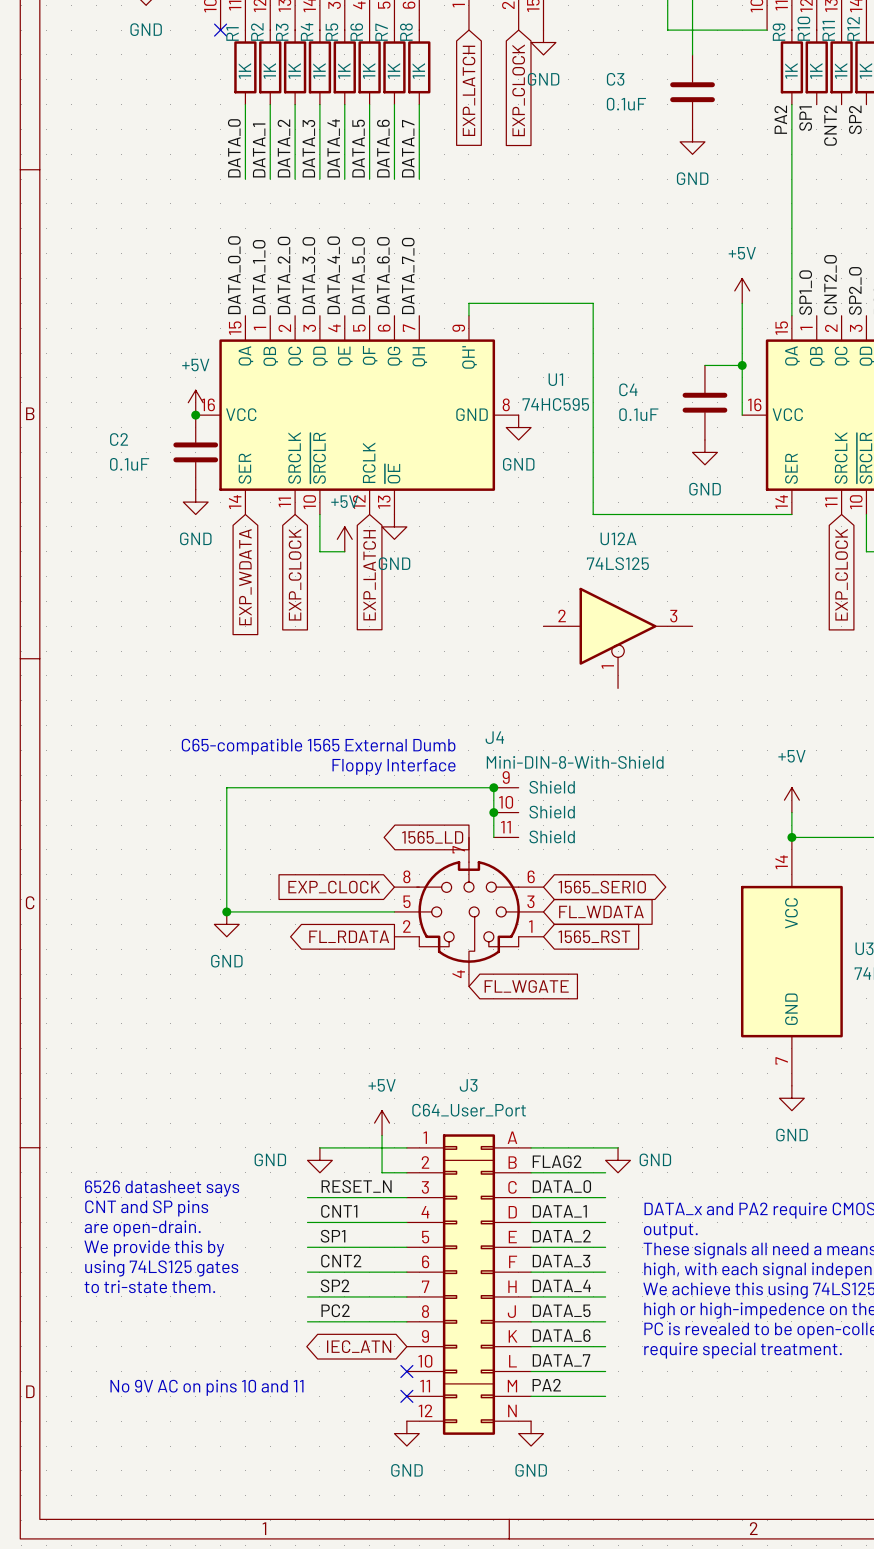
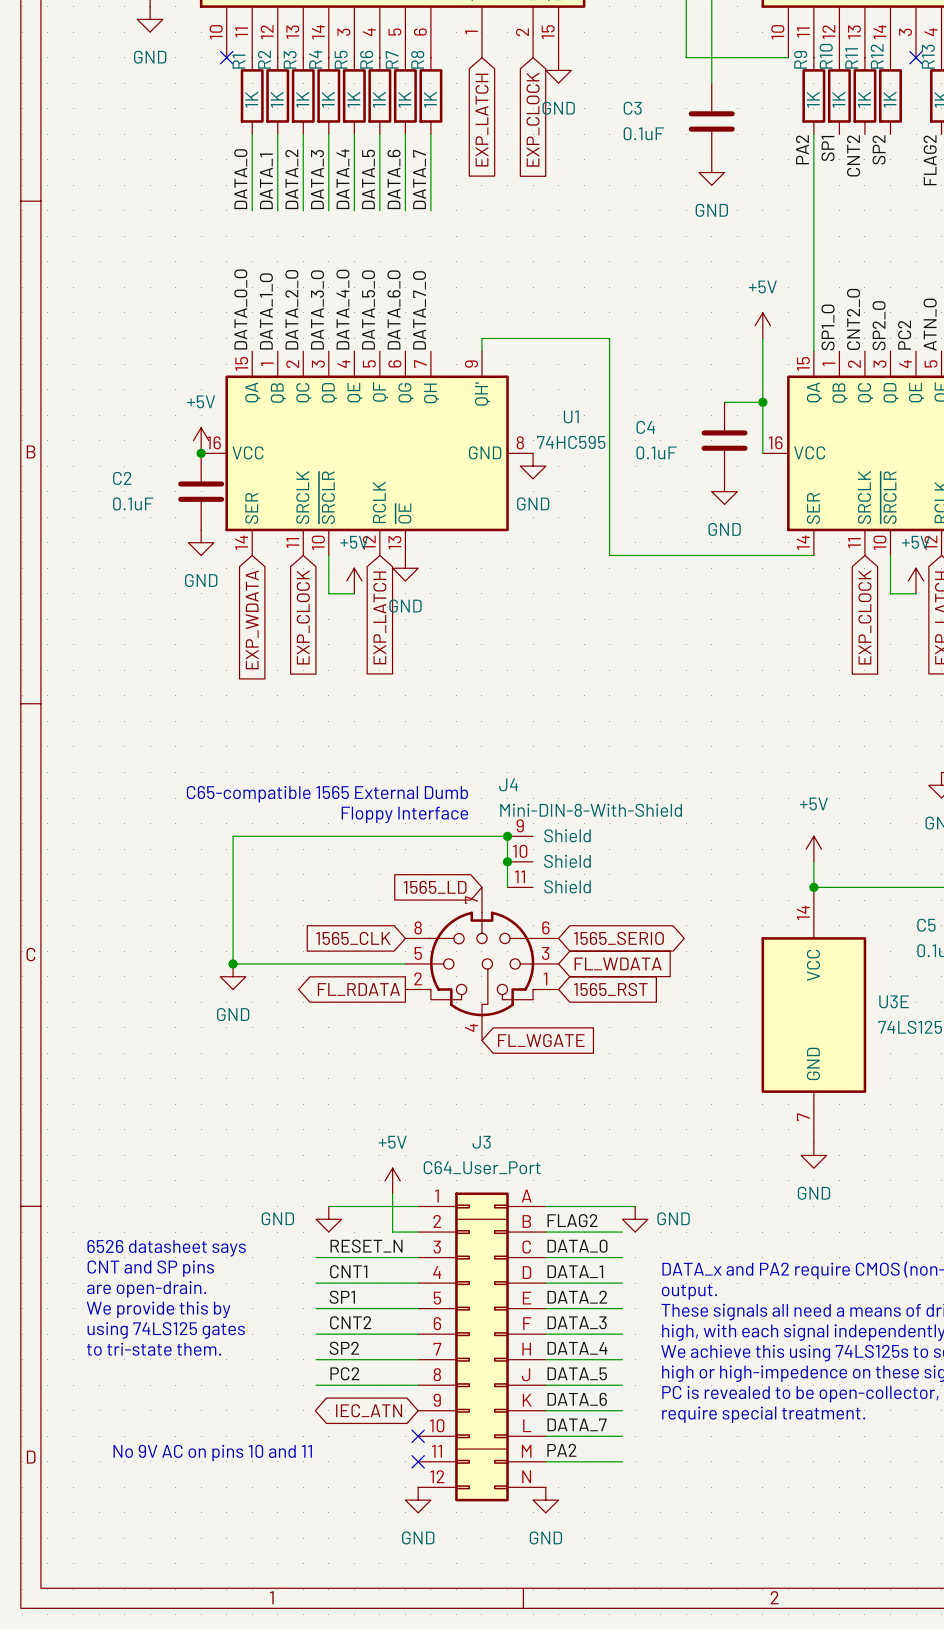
U12A: 74LS125 (618, 638) -> none
global label shape: output (432, 837) -> input (435, 887)
global label: EXP_CLOCK (334, 887) -> 1565_CLK (353, 938)

